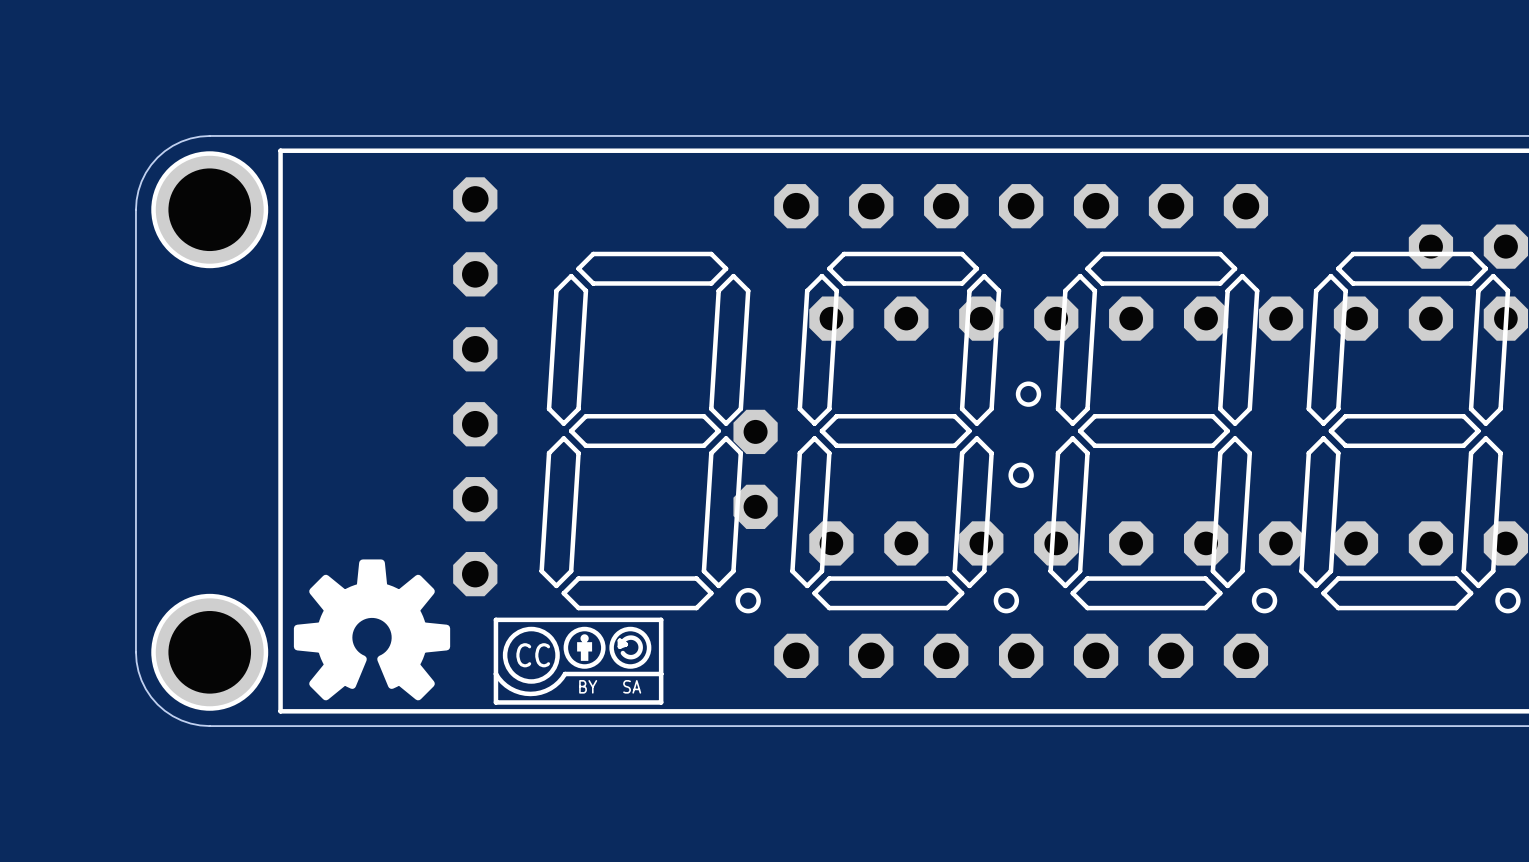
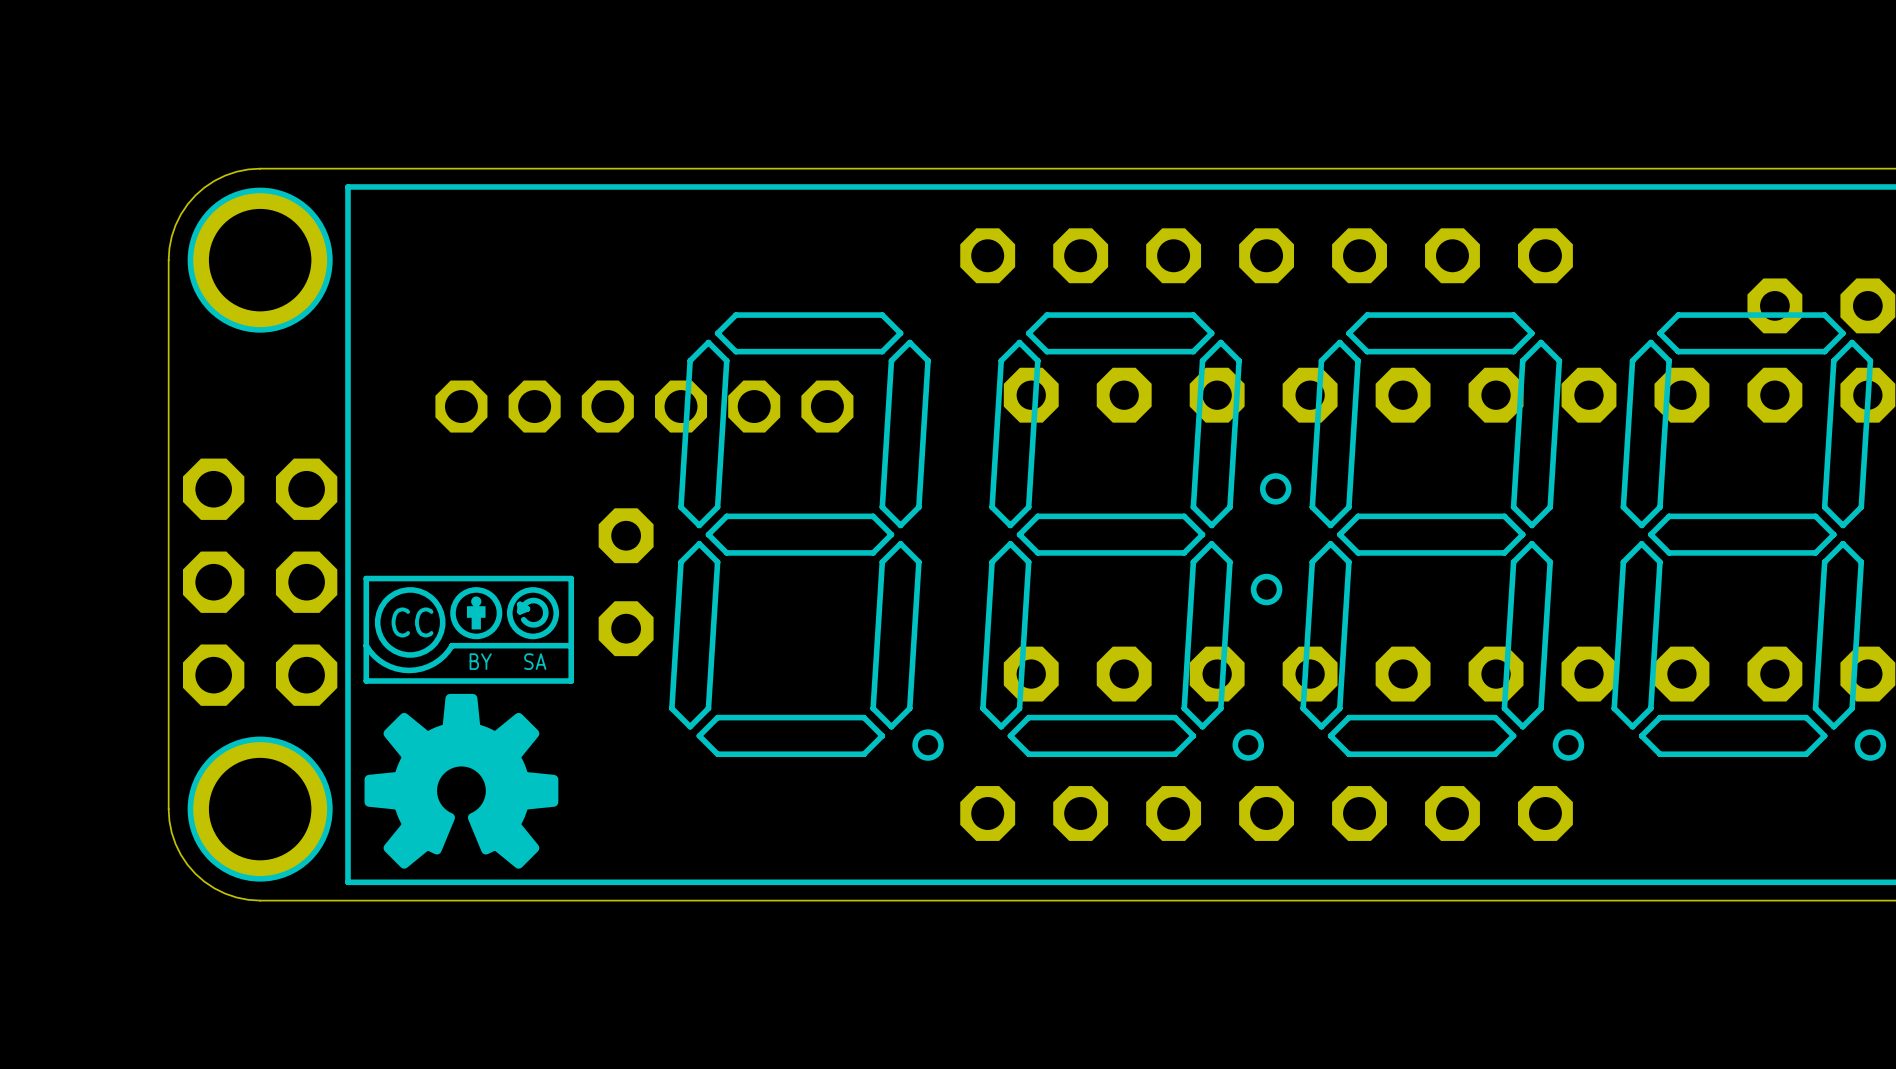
part: none -> (644, 406)
part: (475, 386) -> none
part: none -> (260, 582)
part position: (755, 469) -> (626, 582)
drawing position: (578, 661) -> (468, 629)

